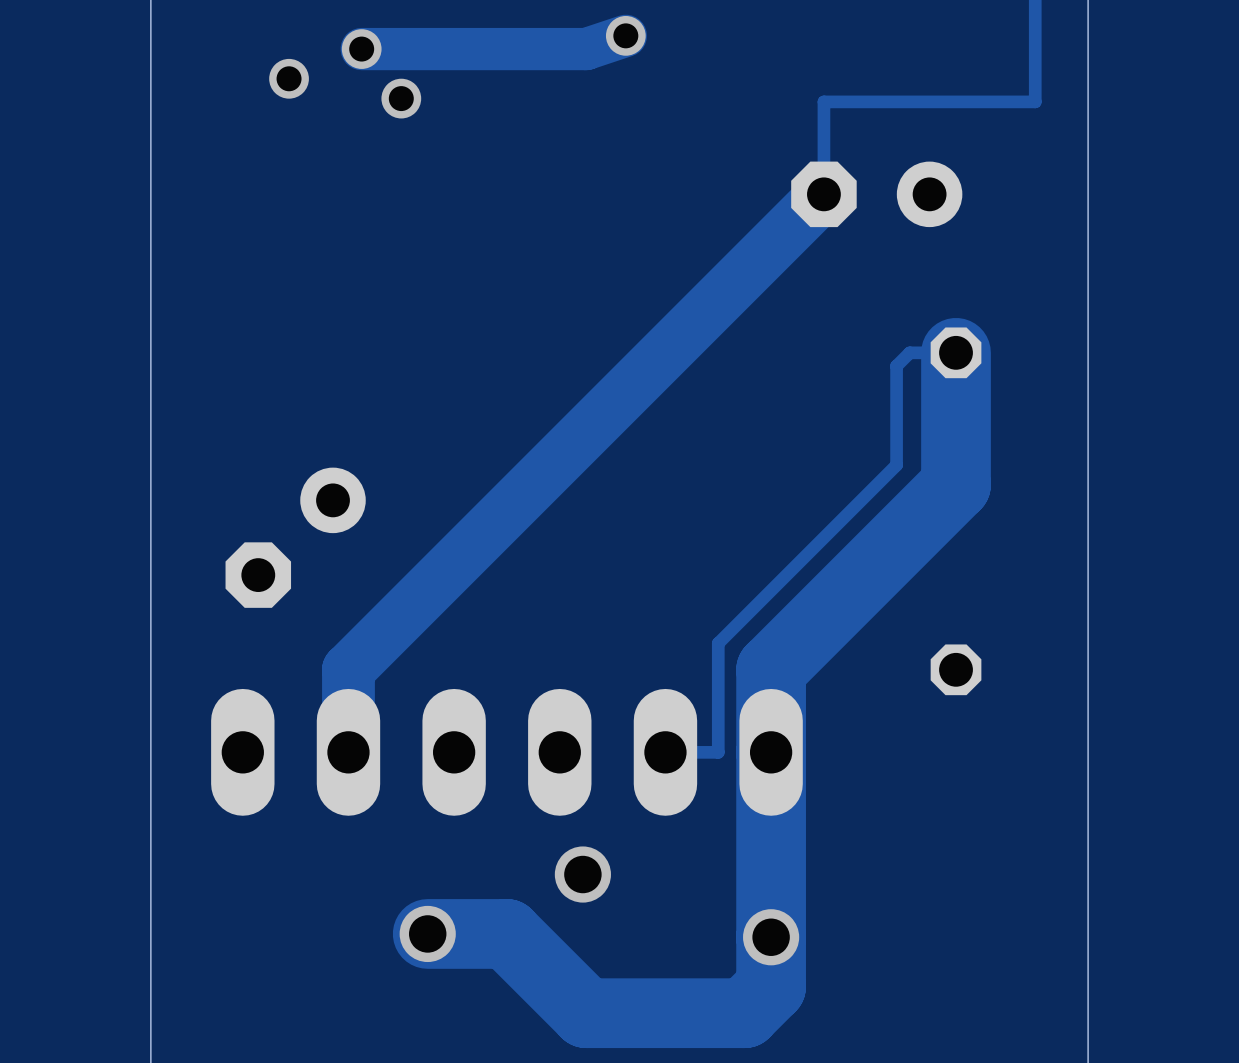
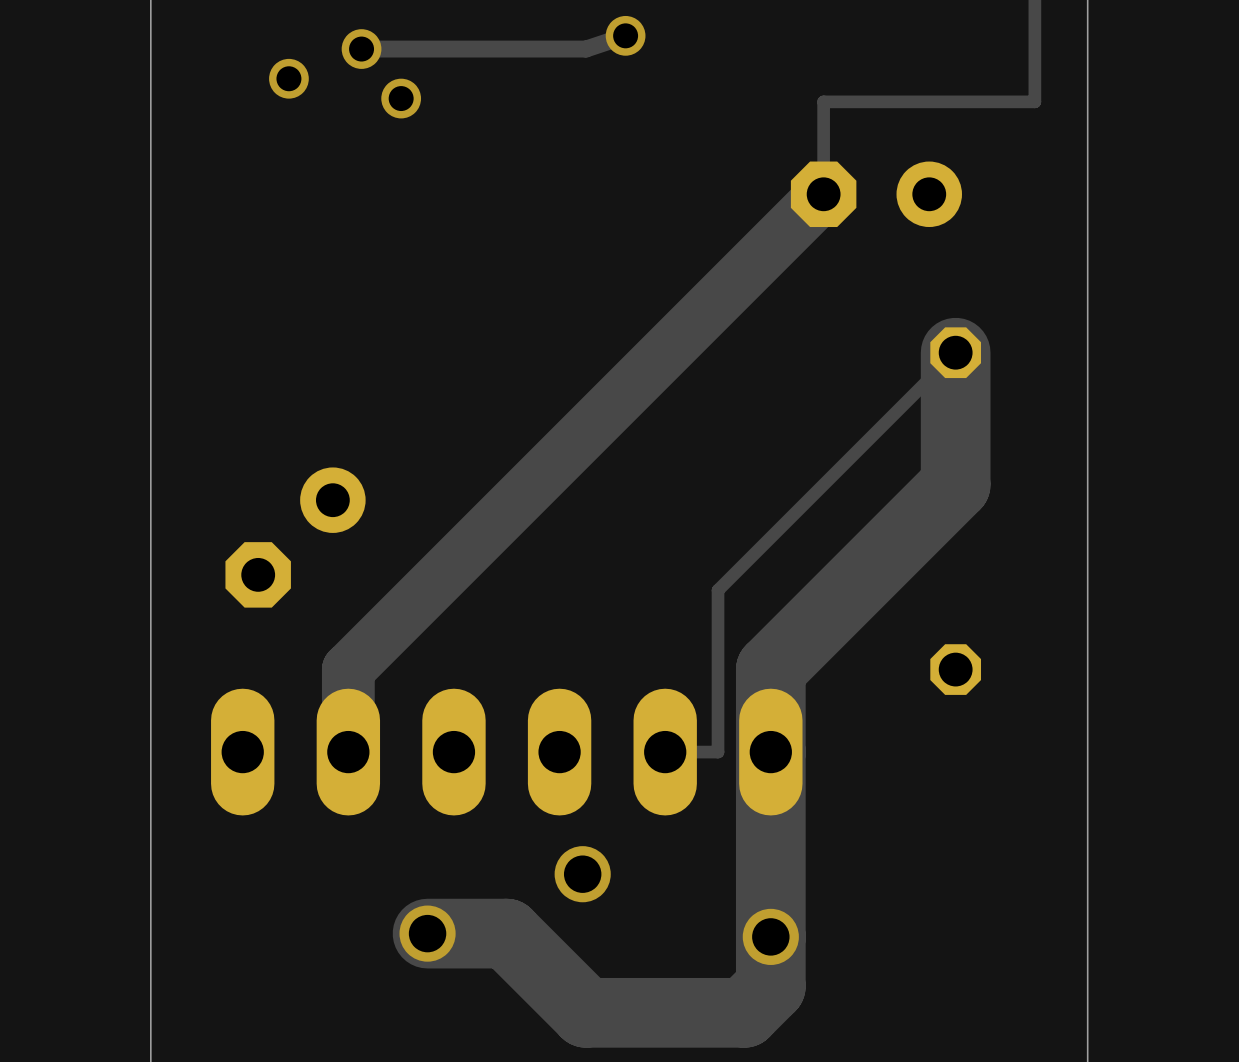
track width: thick (625, 35) (586, 49) (361, 49) -> thin (625, 35) (585, 49) (361, 49)
track: (956, 352) (909, 352) (896, 366) (896, 465) (718, 643) -> (955, 352) (718, 590) (718, 643)

